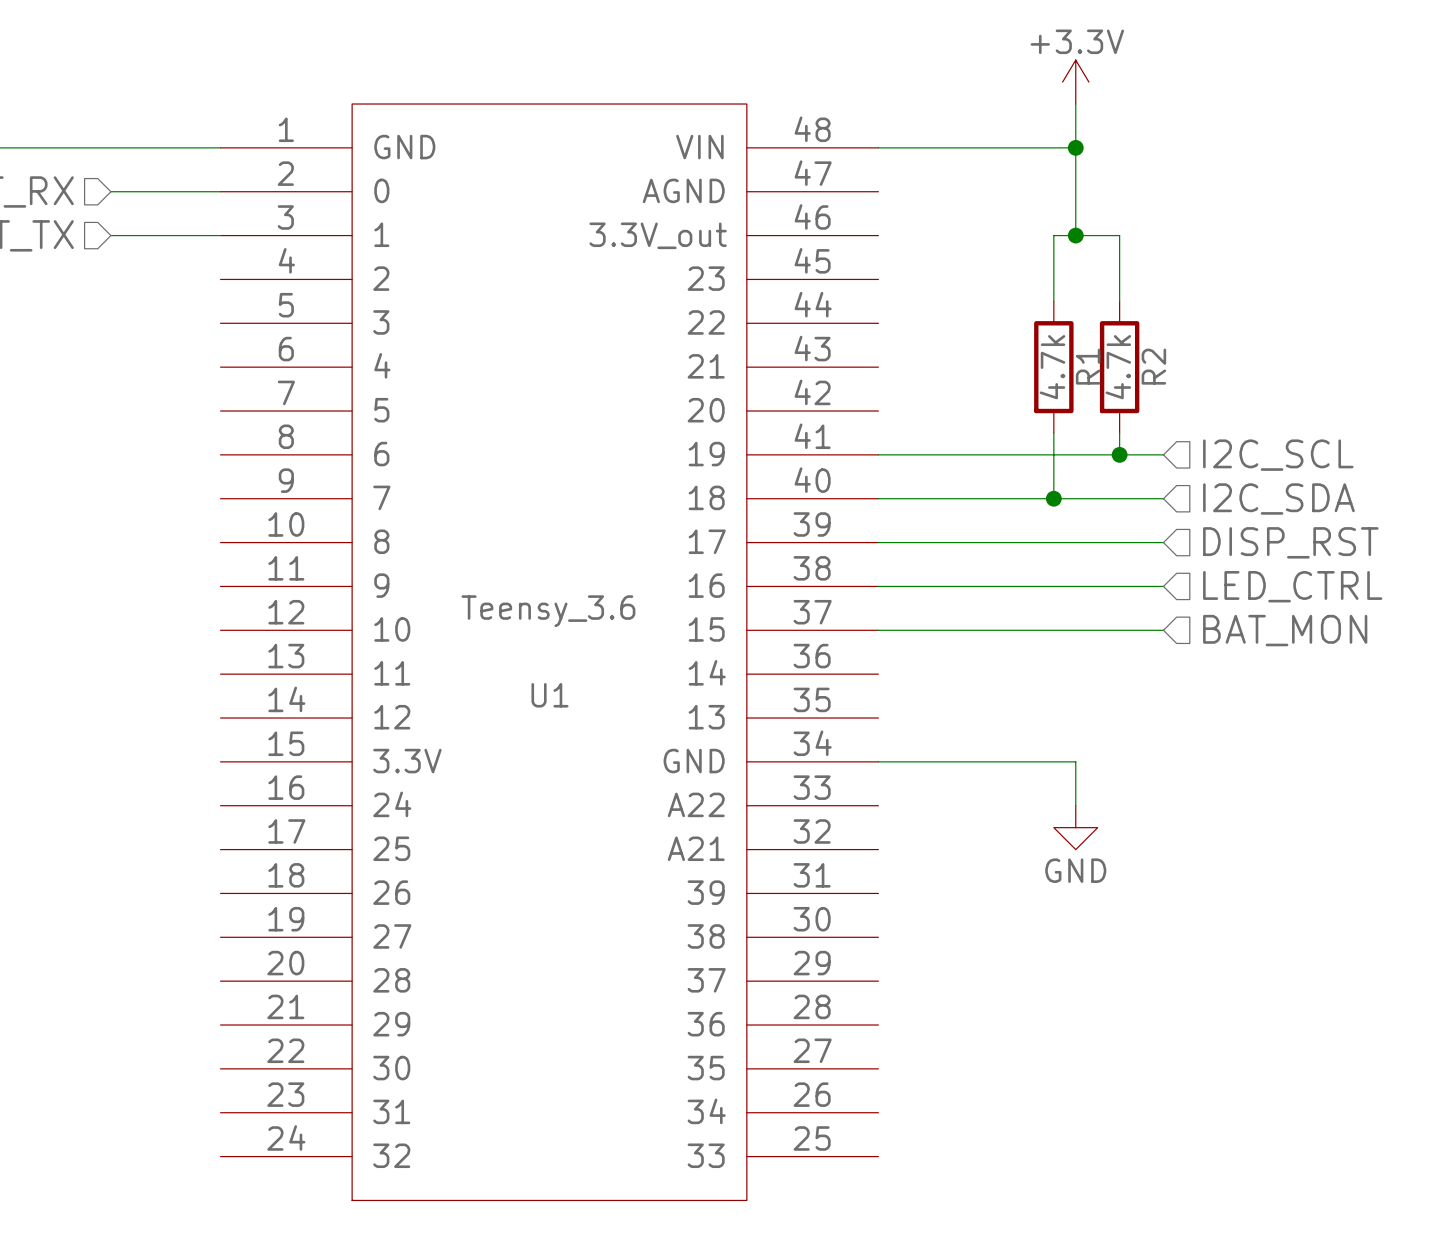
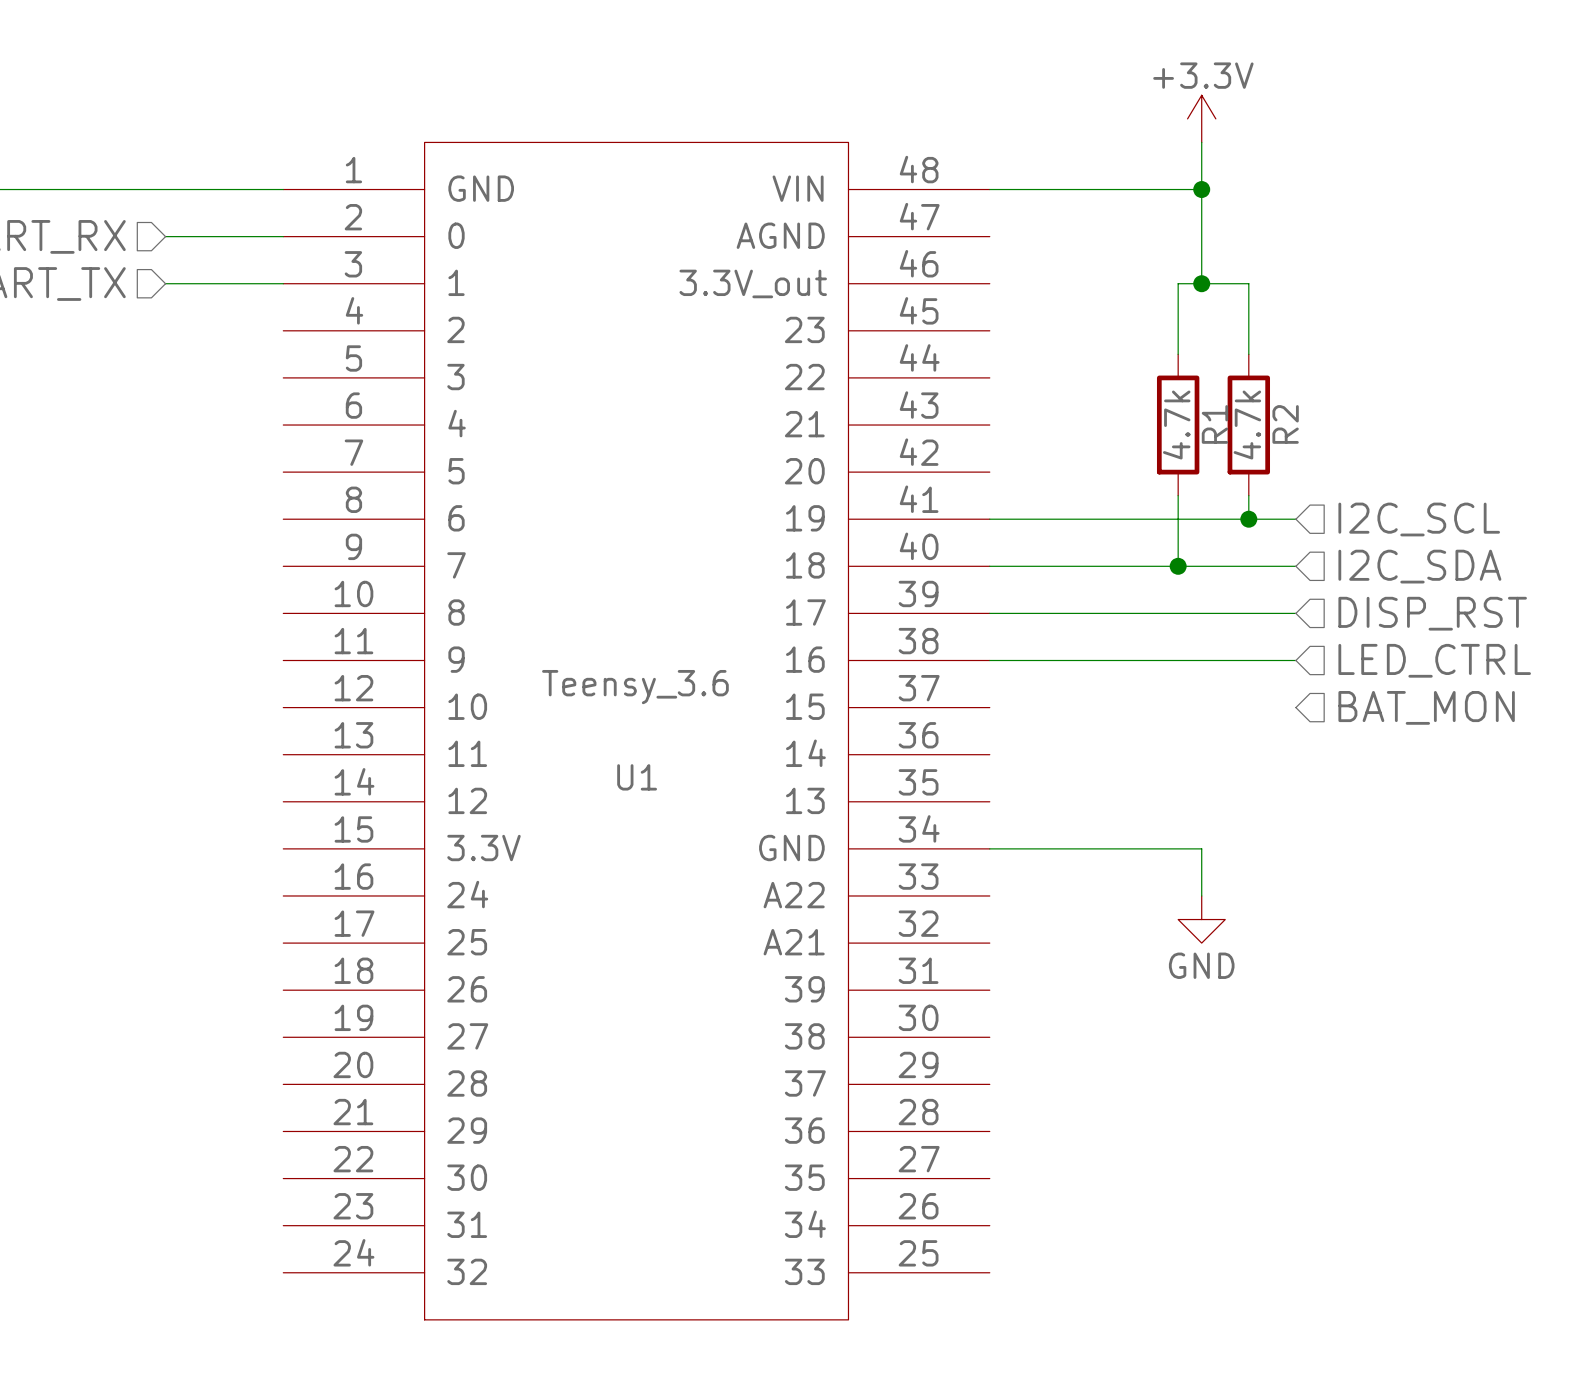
wire: (878, 630) (1163, 630) -> none

